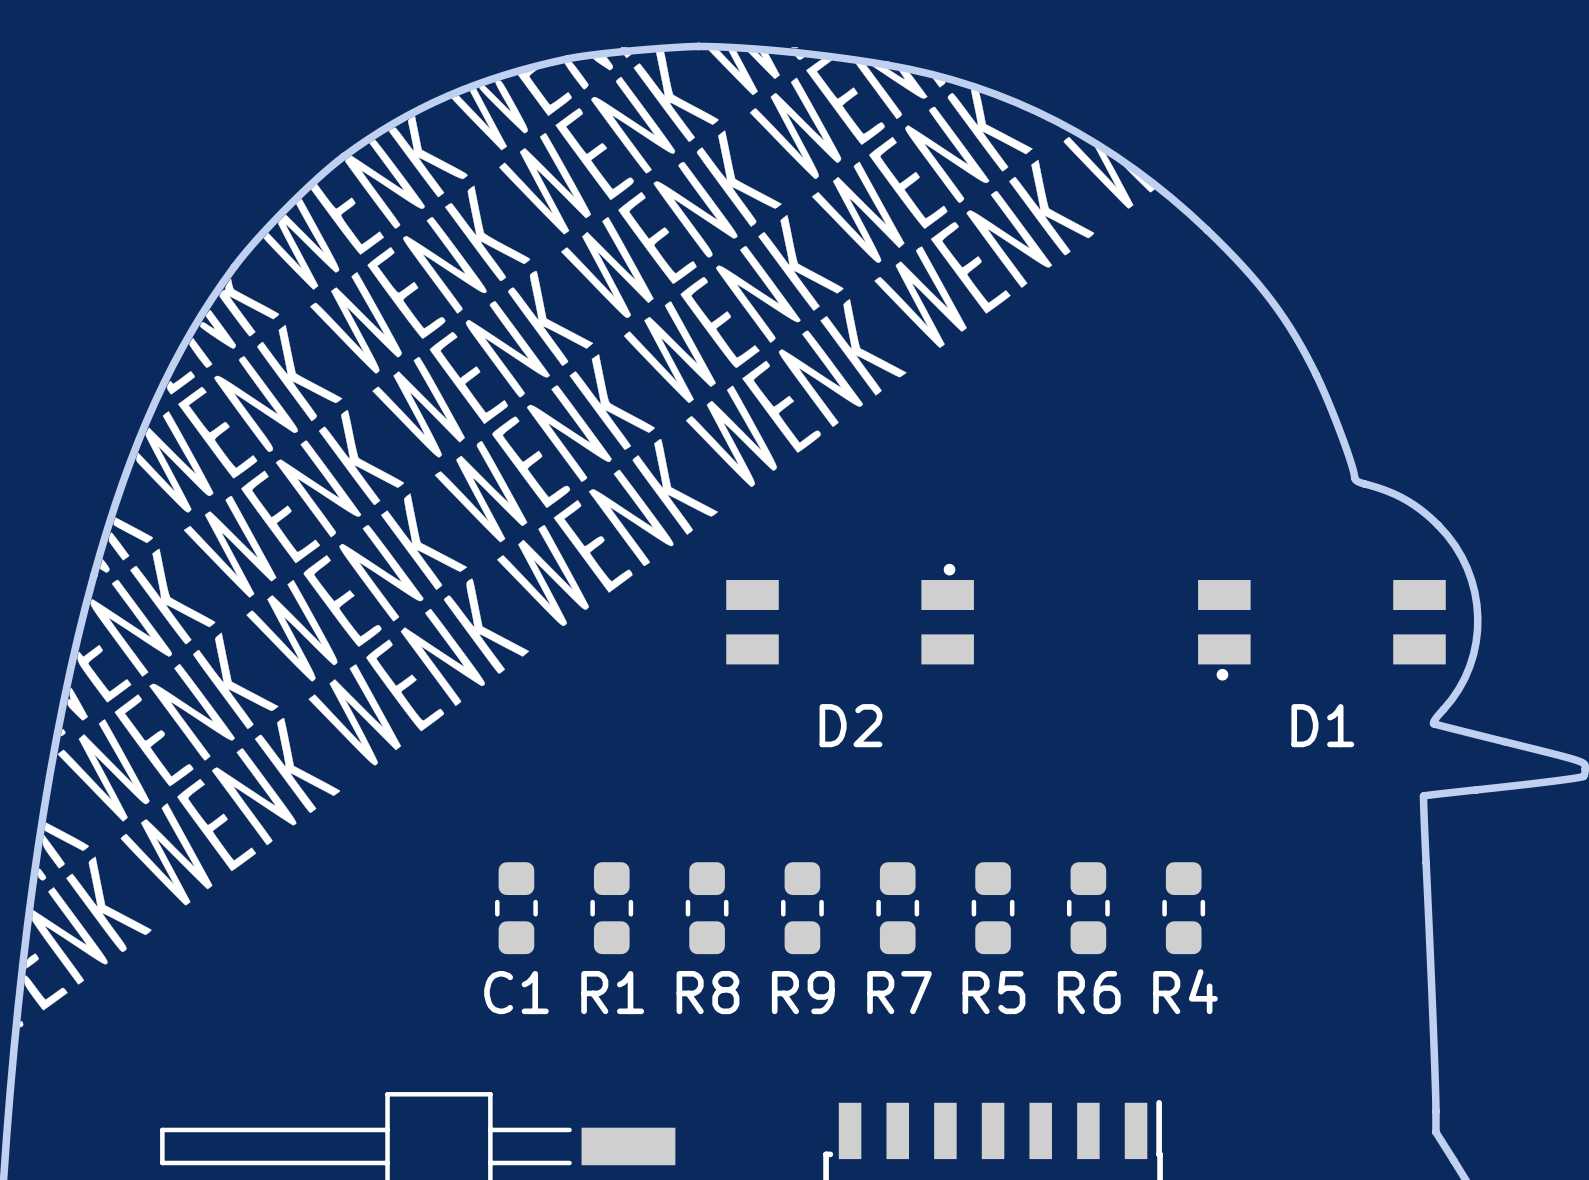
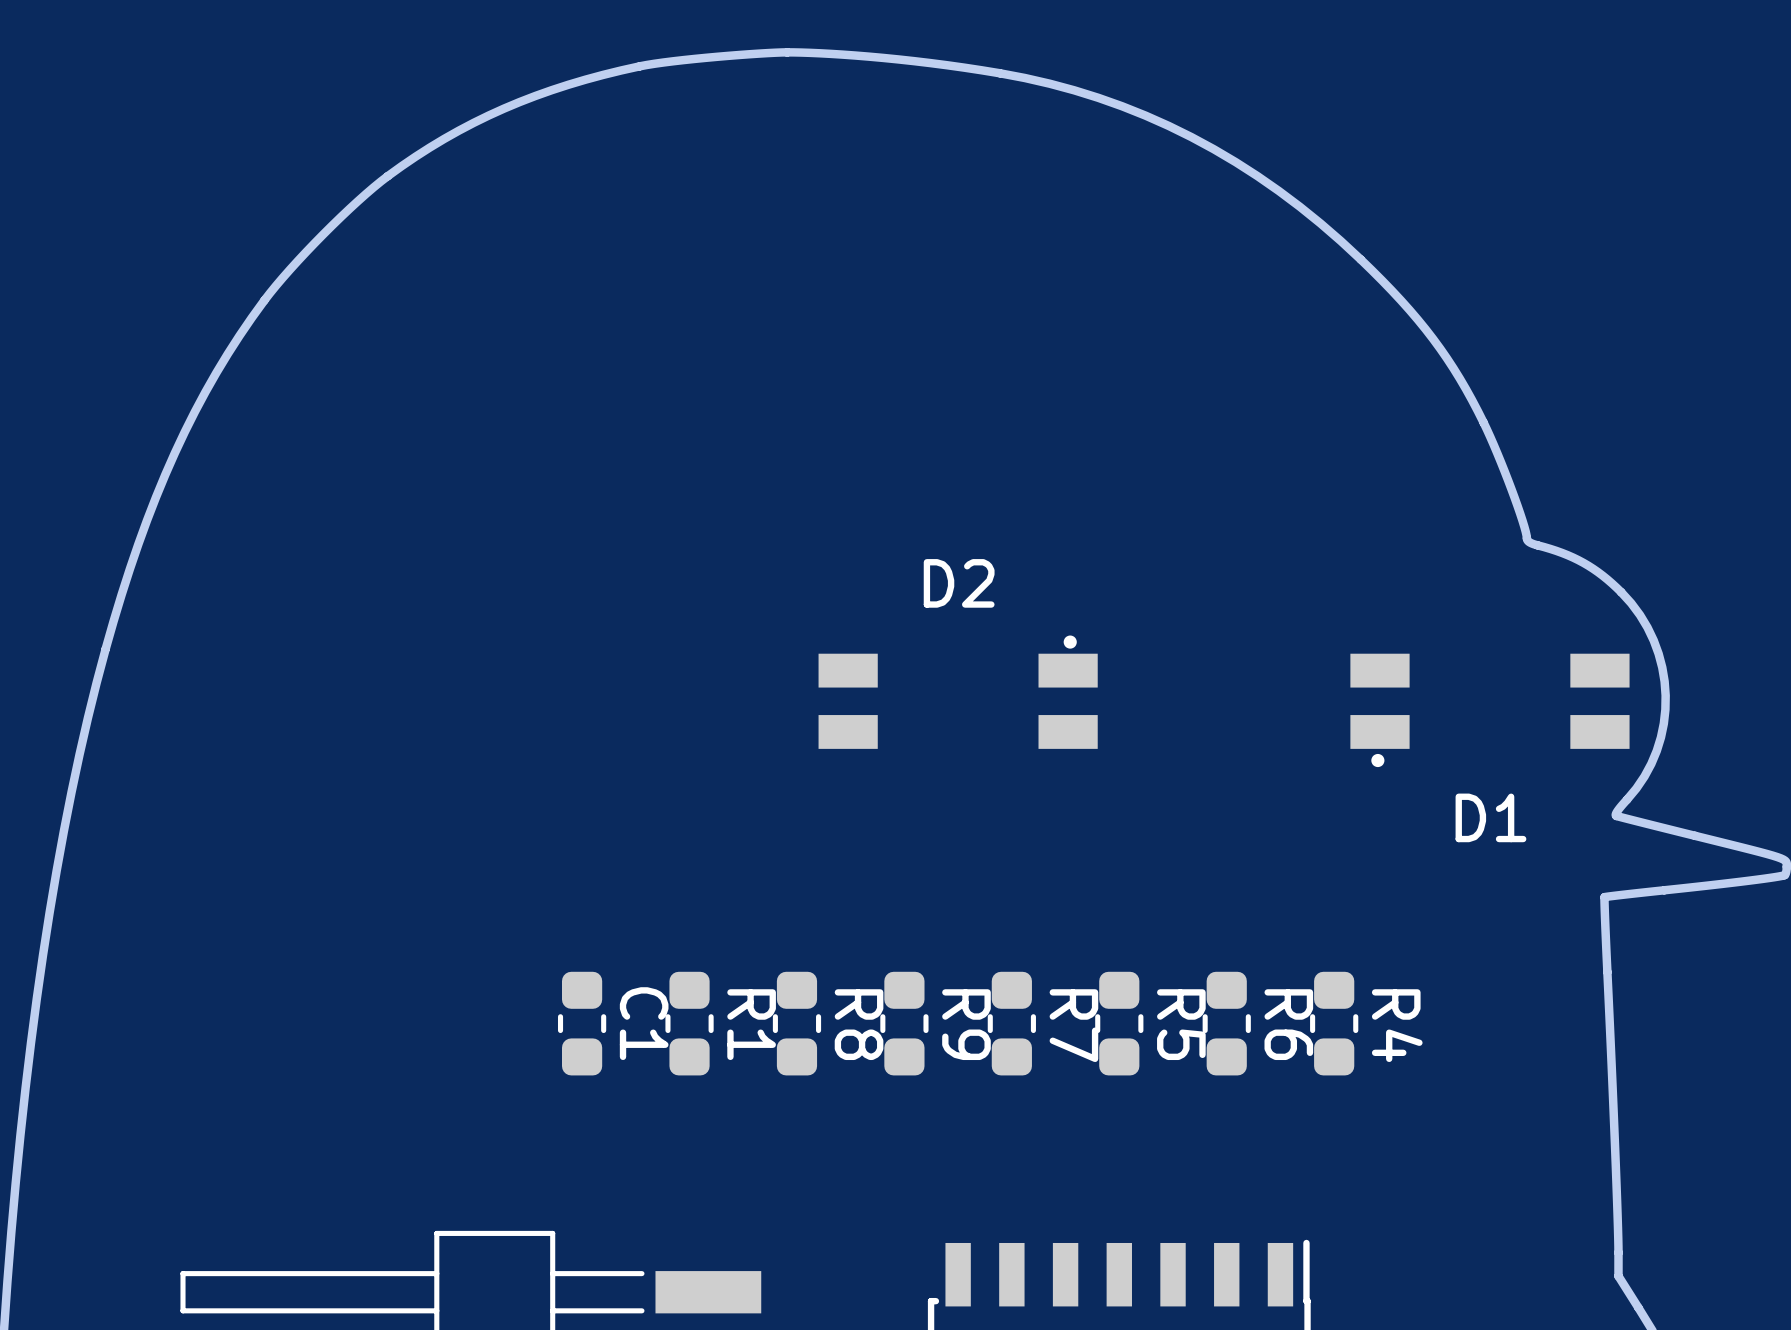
drawing: [19, 47, 1155, 1028] -> none
D2 name position: D2 (850, 725) -> D2 (959, 583)
R4 name rotation: 0° (1185, 991) -> 90° clockwise (1397, 1025)
R4 name position: R4 (1185, 991) -> R4 (1397, 1025)
C1 name rotation: 0° (516, 992) -> 90° clockwise (644, 1023)
C1 name position: C1 (516, 992) -> C1 (644, 1023)
R1 name rotation: 0° (612, 992) -> 90° clockwise (751, 1024)
R1 name position: R1 (612, 992) -> R1 (751, 1024)
R8 name rotation: 0° (707, 992) -> 90° clockwise (859, 1024)
R8 name position: R8 (707, 992) -> R8 (859, 1024)
R9 name rotation: 0° (803, 992) -> 90° clockwise (966, 1024)
R9 name position: R9 (803, 992) -> R9 (966, 1024)
R7 name rotation: 0° (899, 992) -> 90° clockwise (1073, 1025)
R7 name position: R7 (899, 992) -> R7 (1073, 1025)
R5 name rotation: 0° (993, 992) -> 90° clockwise (1181, 1024)
R5 name position: R5 (993, 992) -> R5 (1181, 1024)
R6 name rotation: 0° (1089, 992) -> 90° clockwise (1288, 1024)
R6 name position: R6 (1089, 992) -> R6 (1288, 1024)

